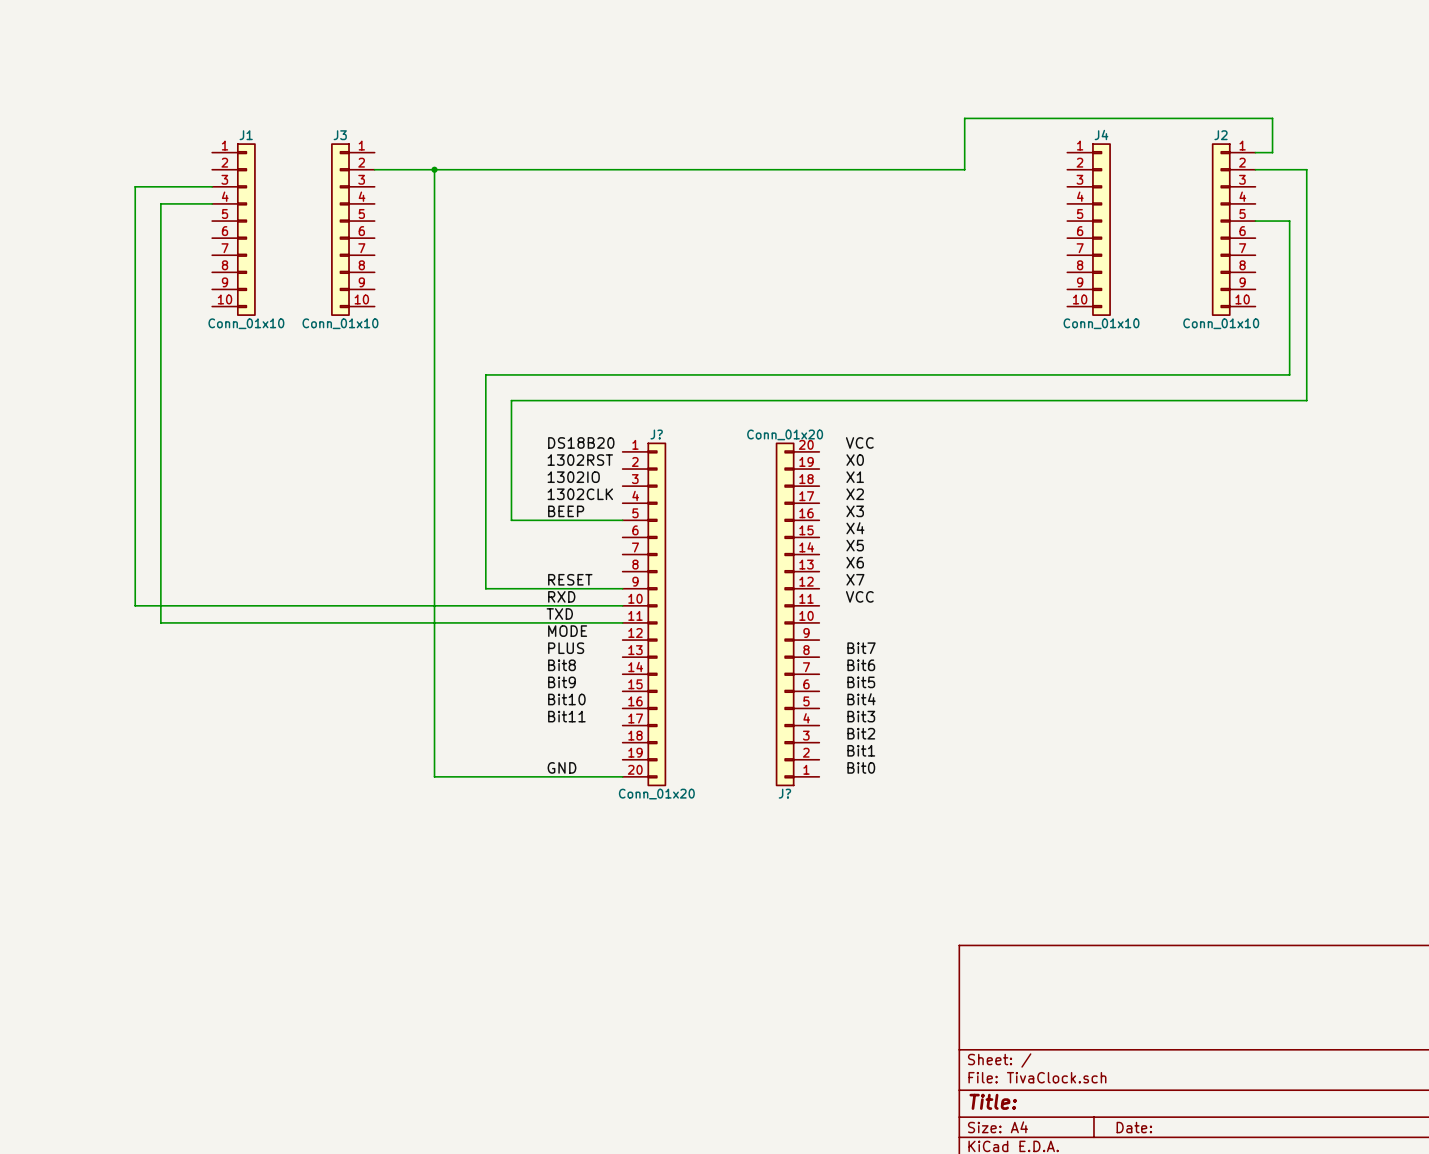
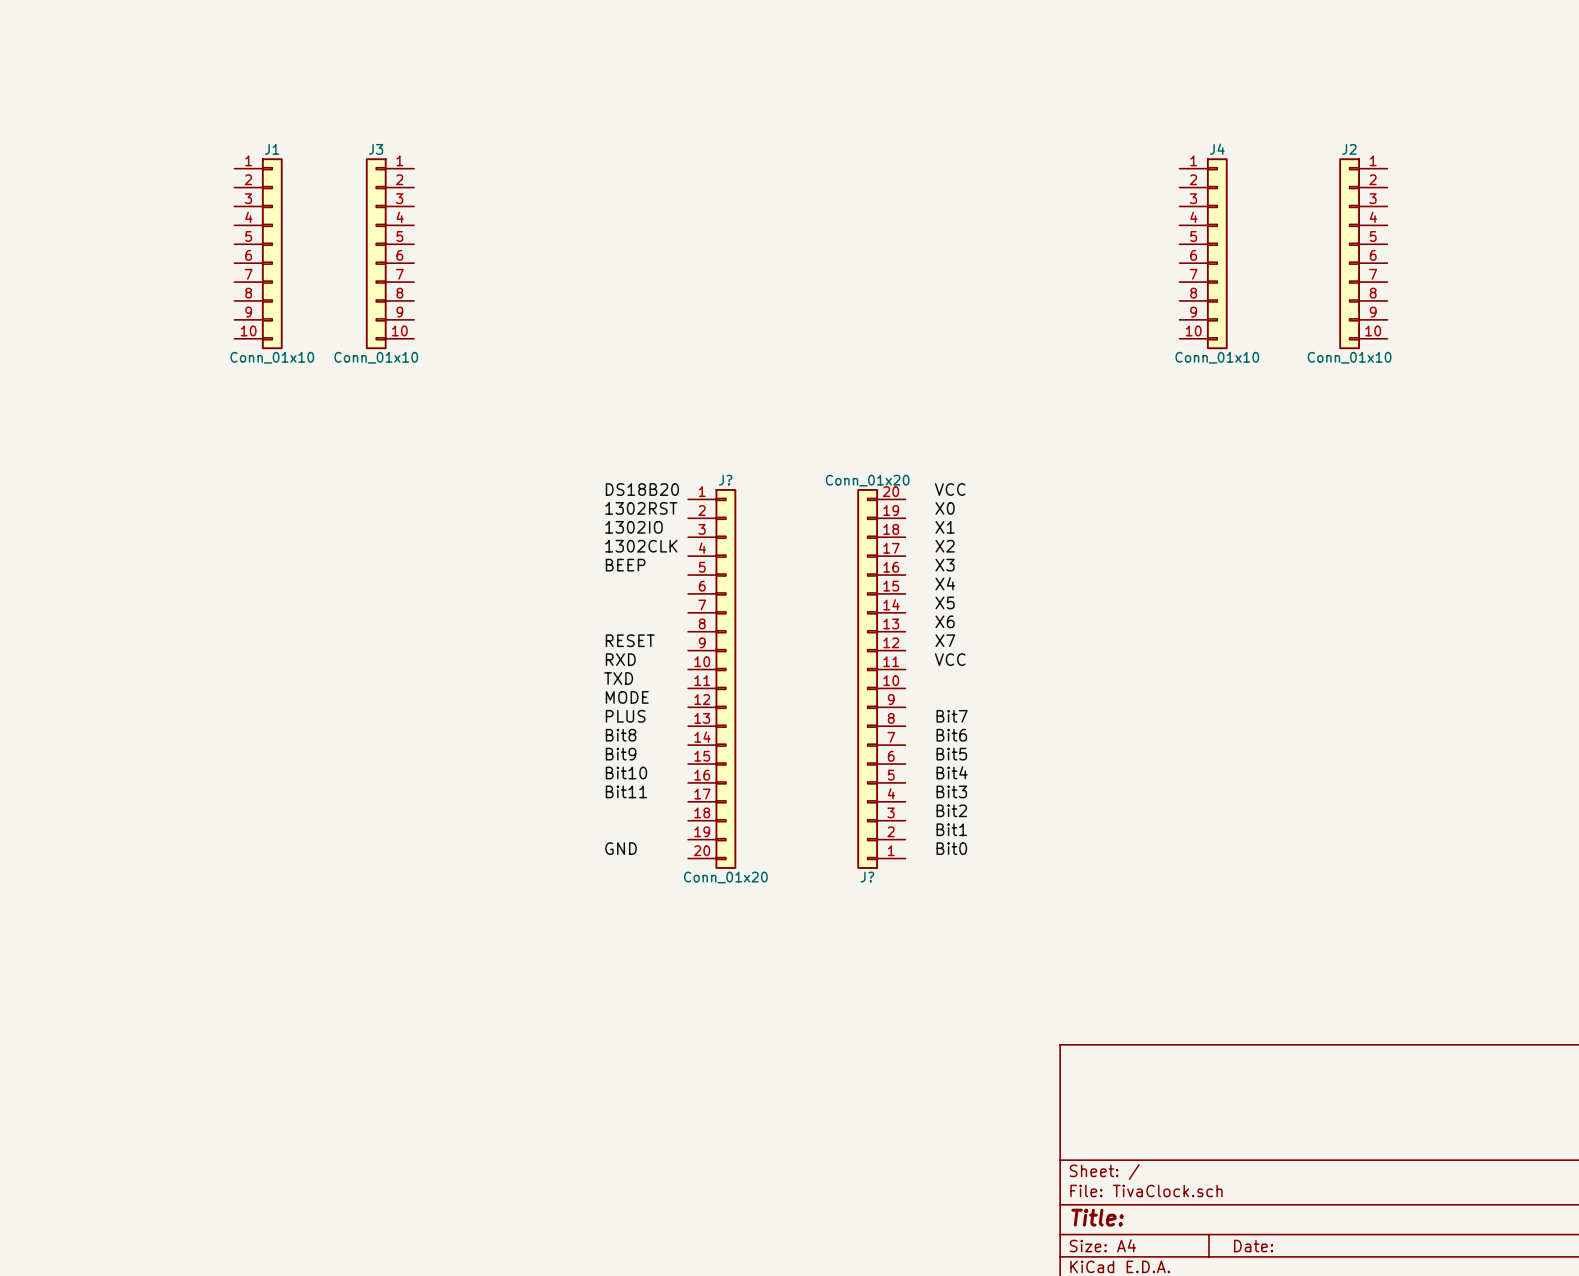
wire: (1255, 152) (1272, 152) (1272, 118) (964, 118) (964, 169) (374, 169) -> none
wire: (434, 169) (434, 776) (622, 776) -> none
junction: (434, 169) -> none
wire: (1255, 169) (1306, 169) (1306, 400) (511, 400) (511, 520) (622, 520) -> none
wire: (212, 186) (135, 186) (135, 605) (622, 605) -> none
wire: (212, 203) (160, 203) (160, 622) (622, 622) -> none
wire: (1255, 221) (1289, 221) (1289, 374) (485, 374) (485, 588) (622, 588) -> none

